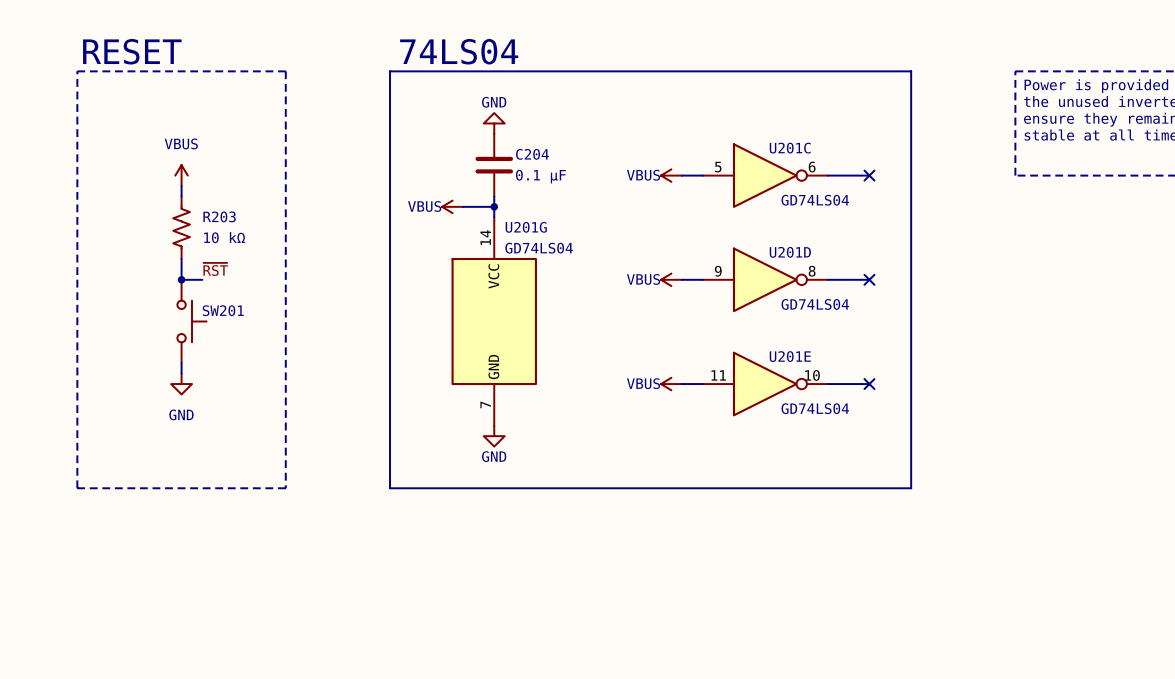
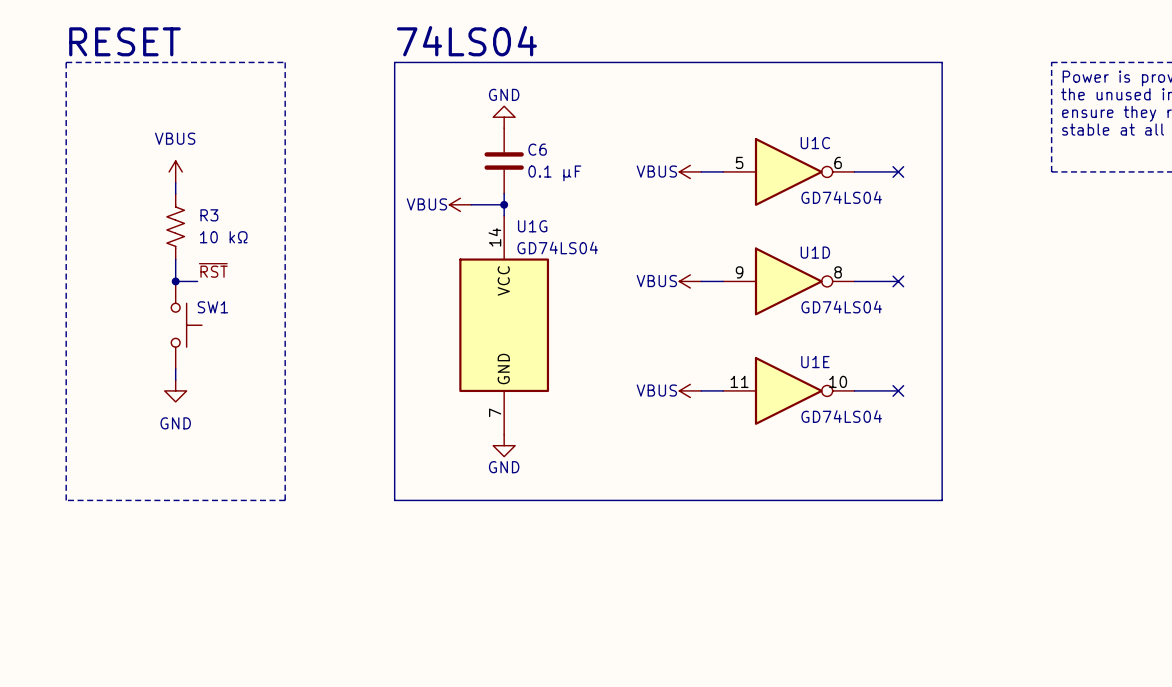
U201C name: U201C (790, 148) -> U1C (815, 143)
C204 name: C204 (532, 154) -> C6 (537, 149)
R203 name: R203 (219, 216) -> R3 (209, 215)
U201G name: U201G (526, 227) -> U1G (532, 226)
U201D name: U201D (790, 252) -> U1D (815, 252)
SW201 name: SW201 (223, 310) -> SW1 (212, 307)
U201E name: U201E (790, 356) -> U1E (815, 362)

